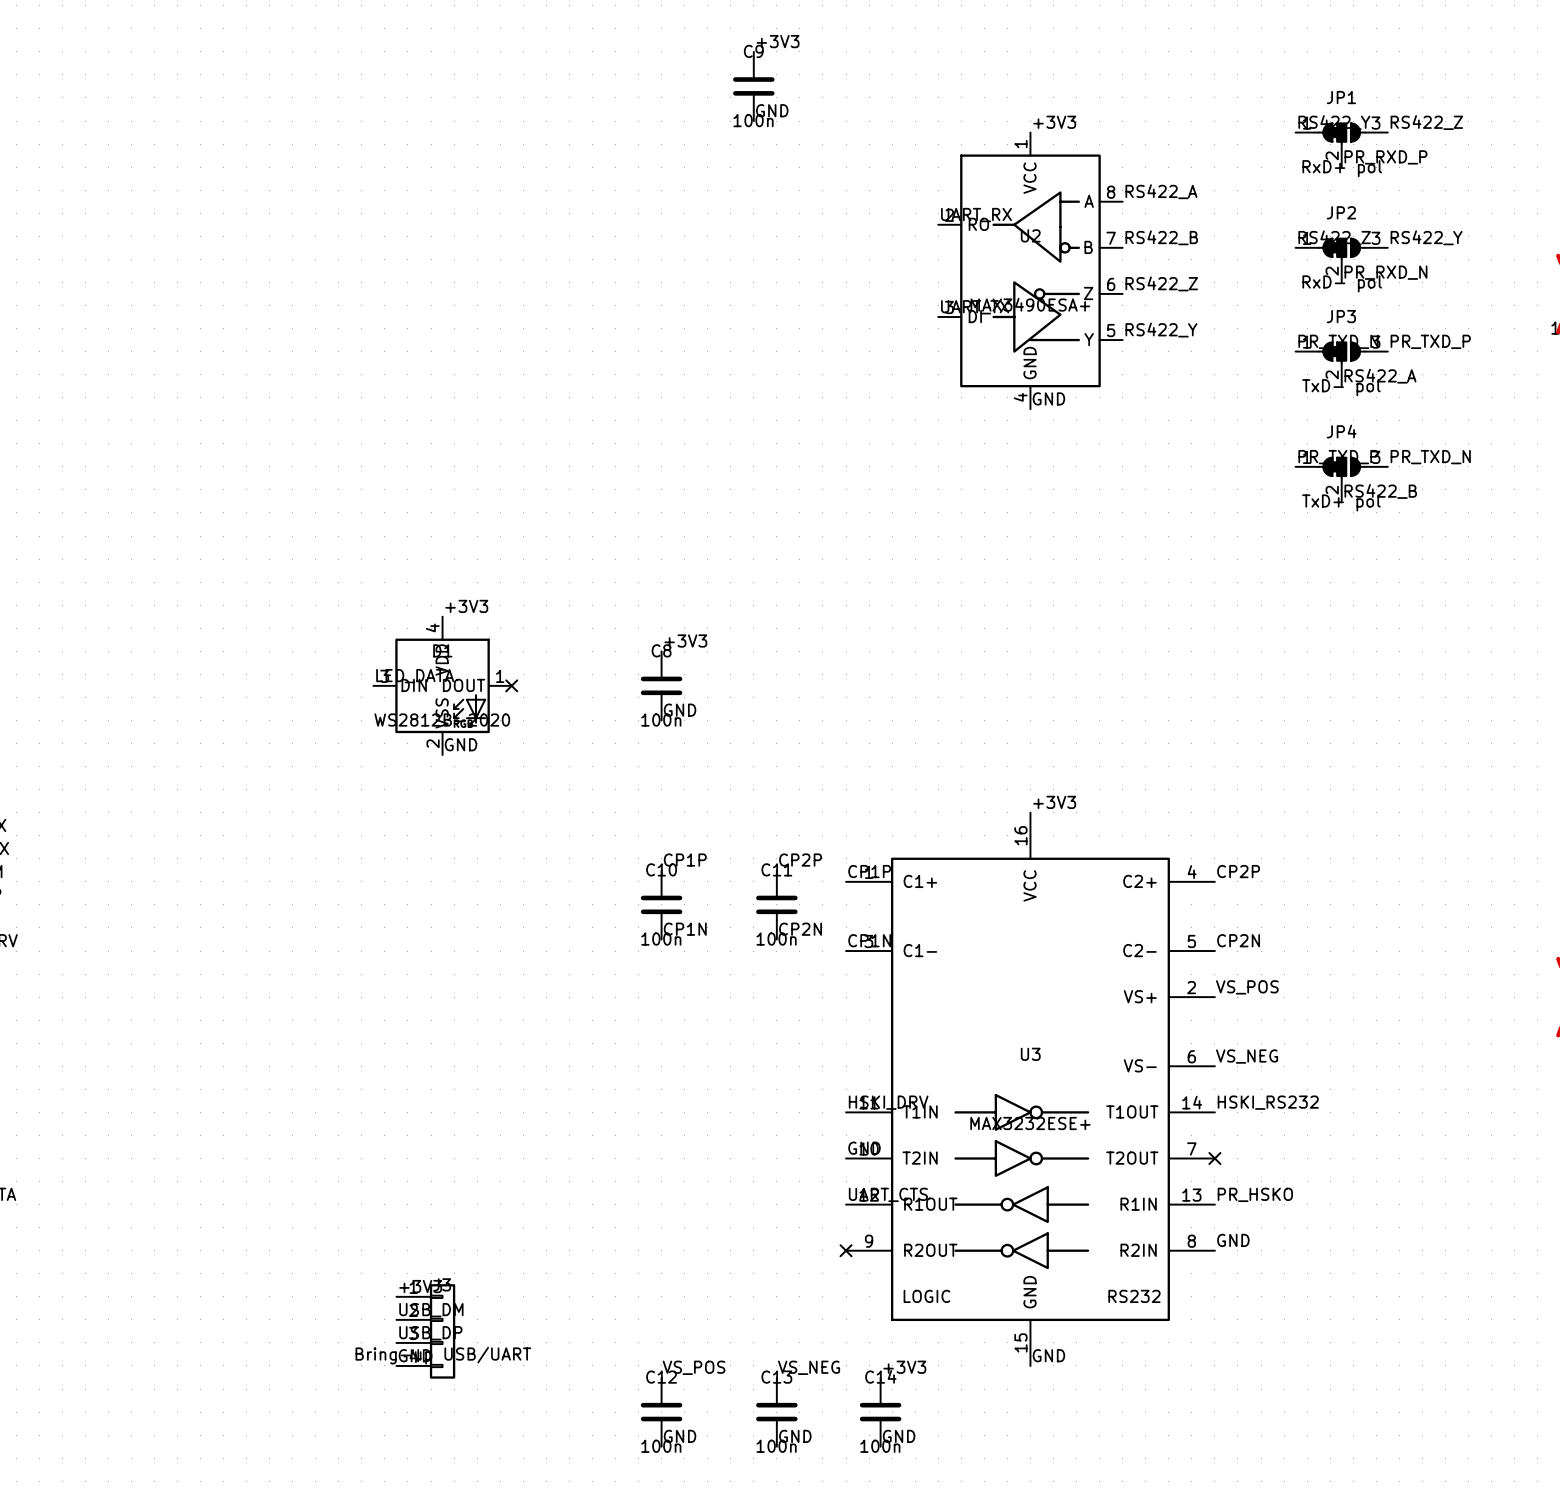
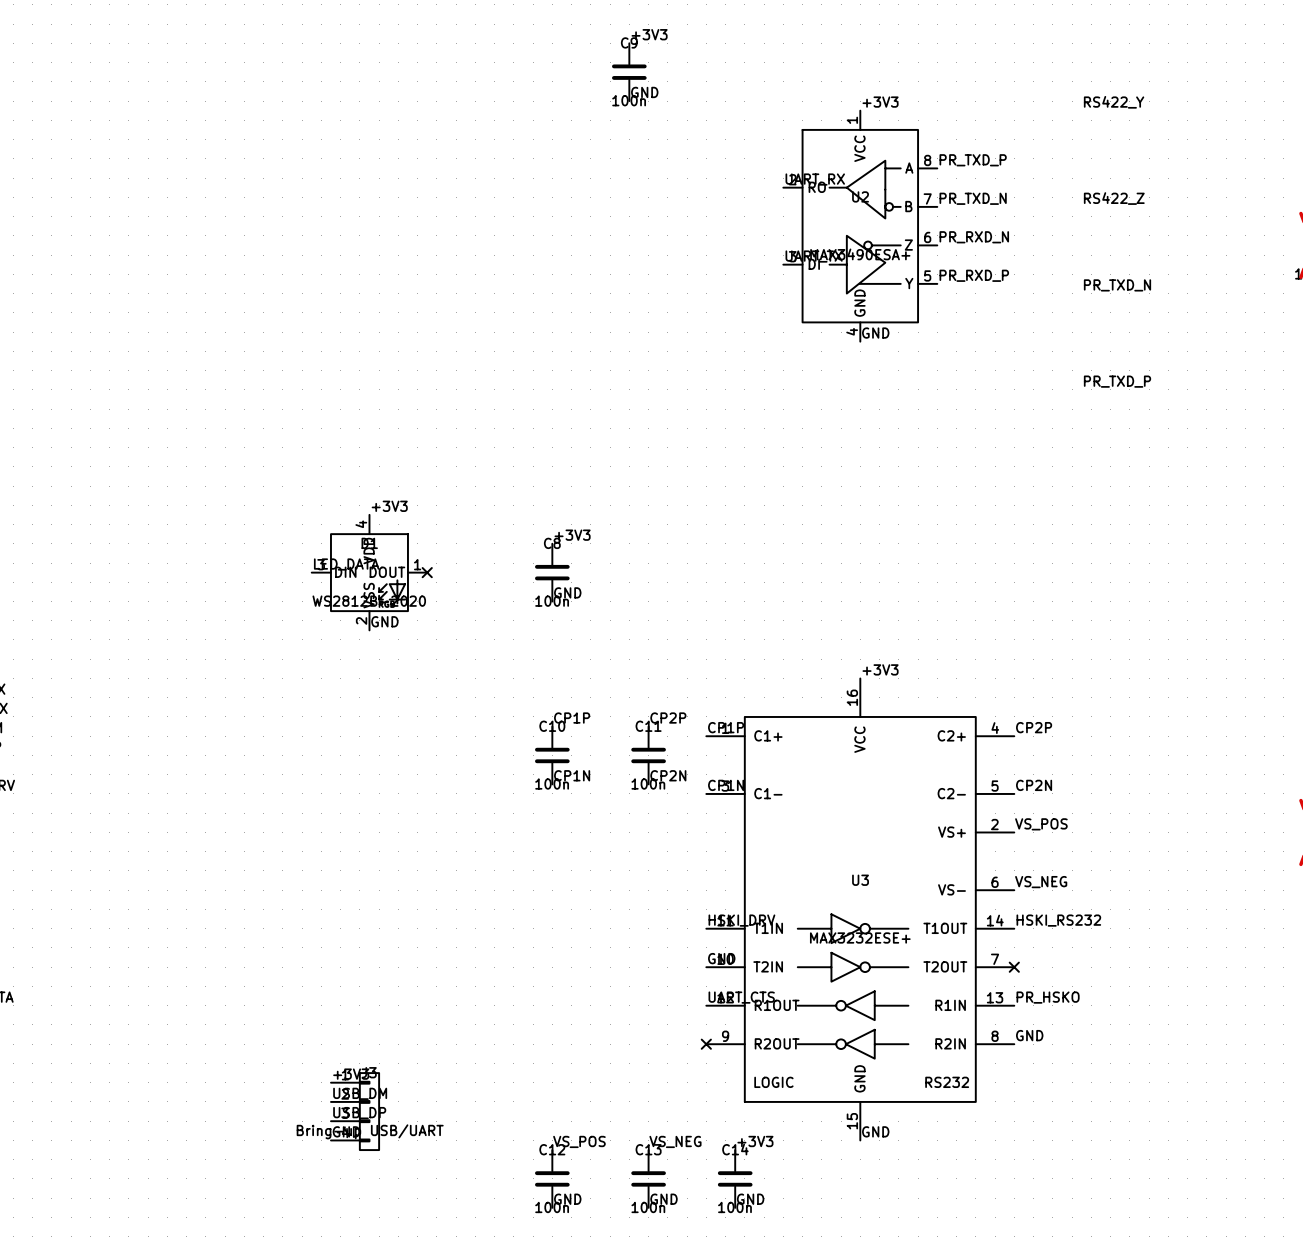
label: RS422_Z (1426, 122) -> none
JP1: RxD+ pol (1341, 145) -> none
label: PR_RXD_P (1385, 157) -> none
label: RS422_A (1161, 191) -> PR_TXD_P (973, 160)
label: RS422_B (1161, 237) -> PR_TXD_N (973, 198)
label: RS422_Y (1426, 237) -> none
JP2: RxD- pol (1341, 260) -> none
label: PR_RXD_N (1385, 272) -> none
label: RS422_Z (1161, 283) -> PR_RXD_N (974, 237)
label: RS422_Y (1161, 330) -> PR_RXD_P (974, 275)
label: PR_TXD_P (1430, 341) -> none
JP3: TxD- pol (1341, 364) -> none
label: RS422_A (1380, 376) -> none
label: PR_TXD_N (1430, 457) -> none
JP4: TxD+ pol (1341, 479) -> none
label: RS422_B (1380, 491) -> none

